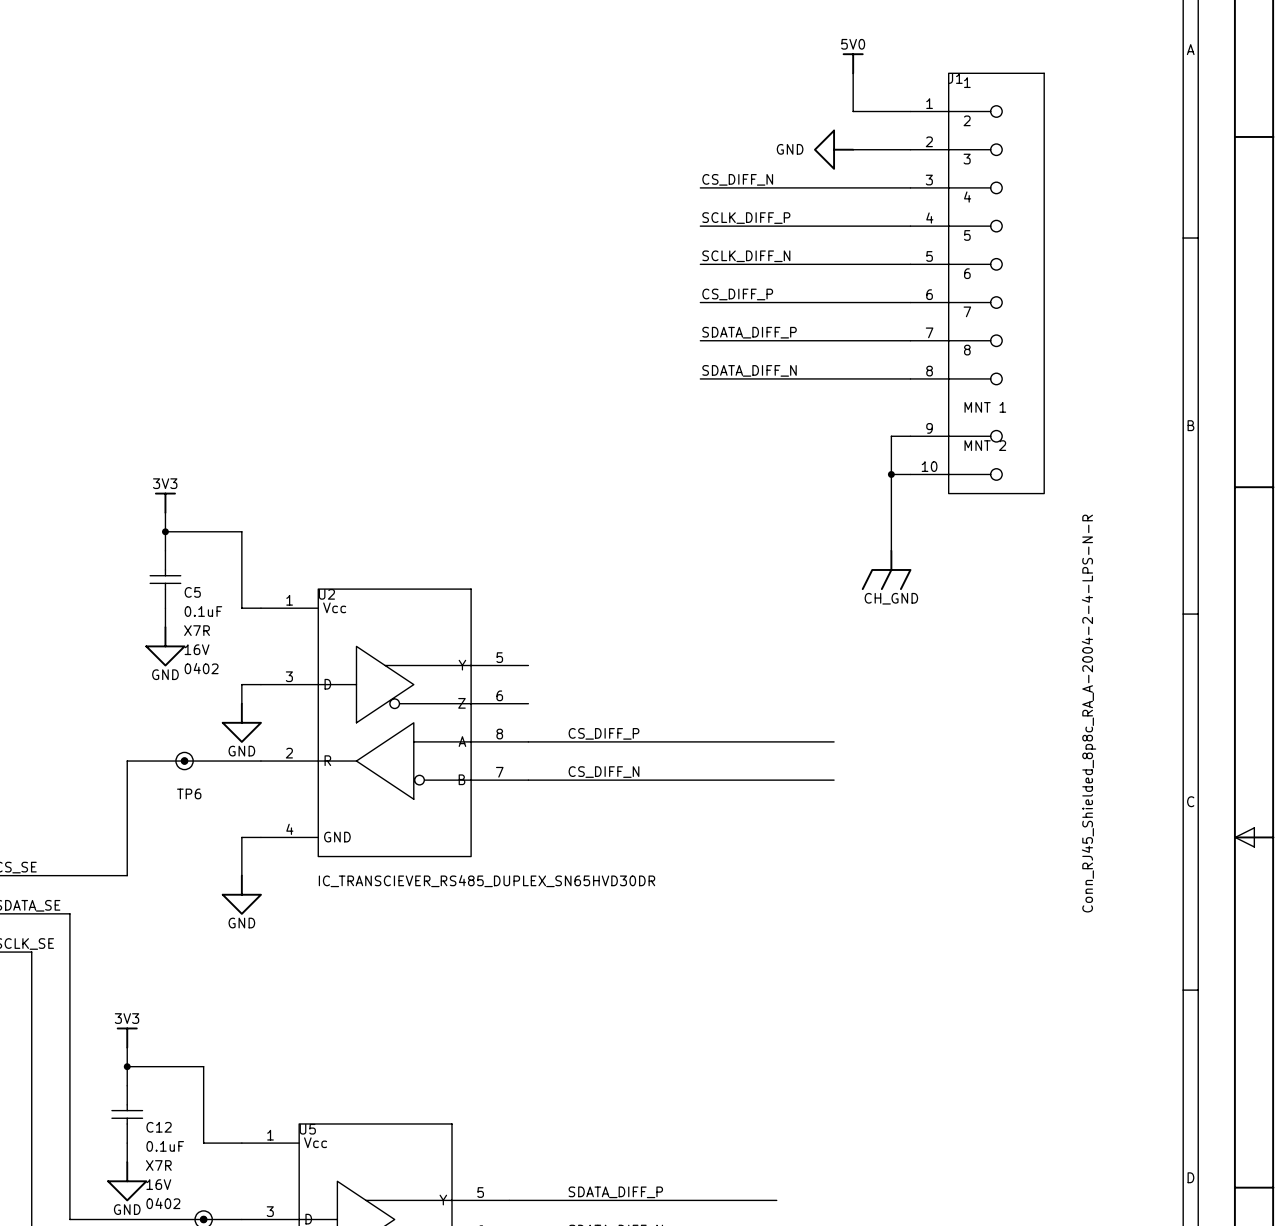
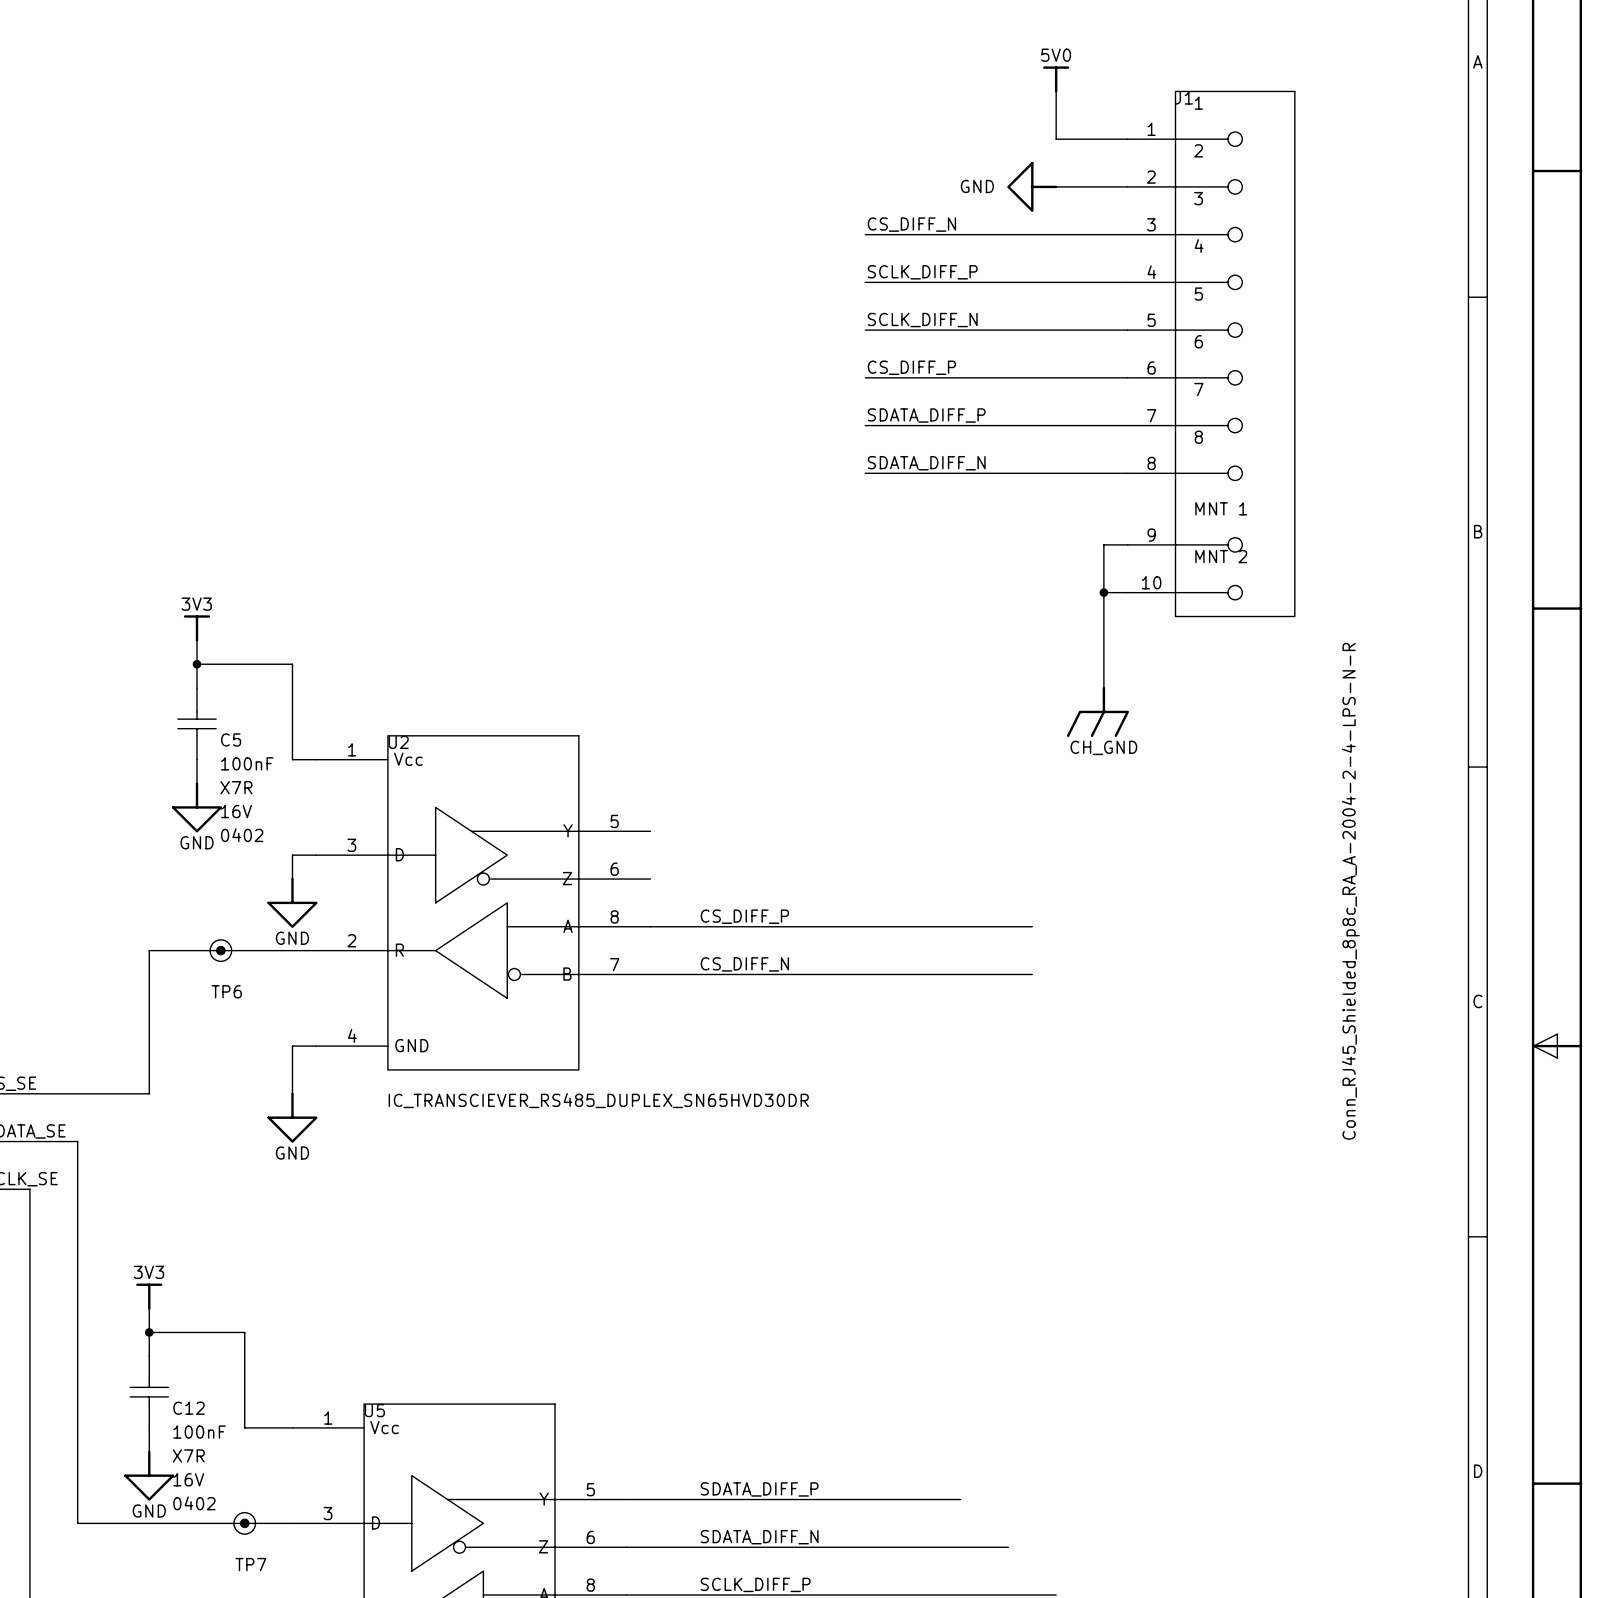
C5 text: 0.1uF (203, 611) -> 100nF (247, 763)
C12 text: 0.1uF (165, 1146) -> 100nF (199, 1432)

